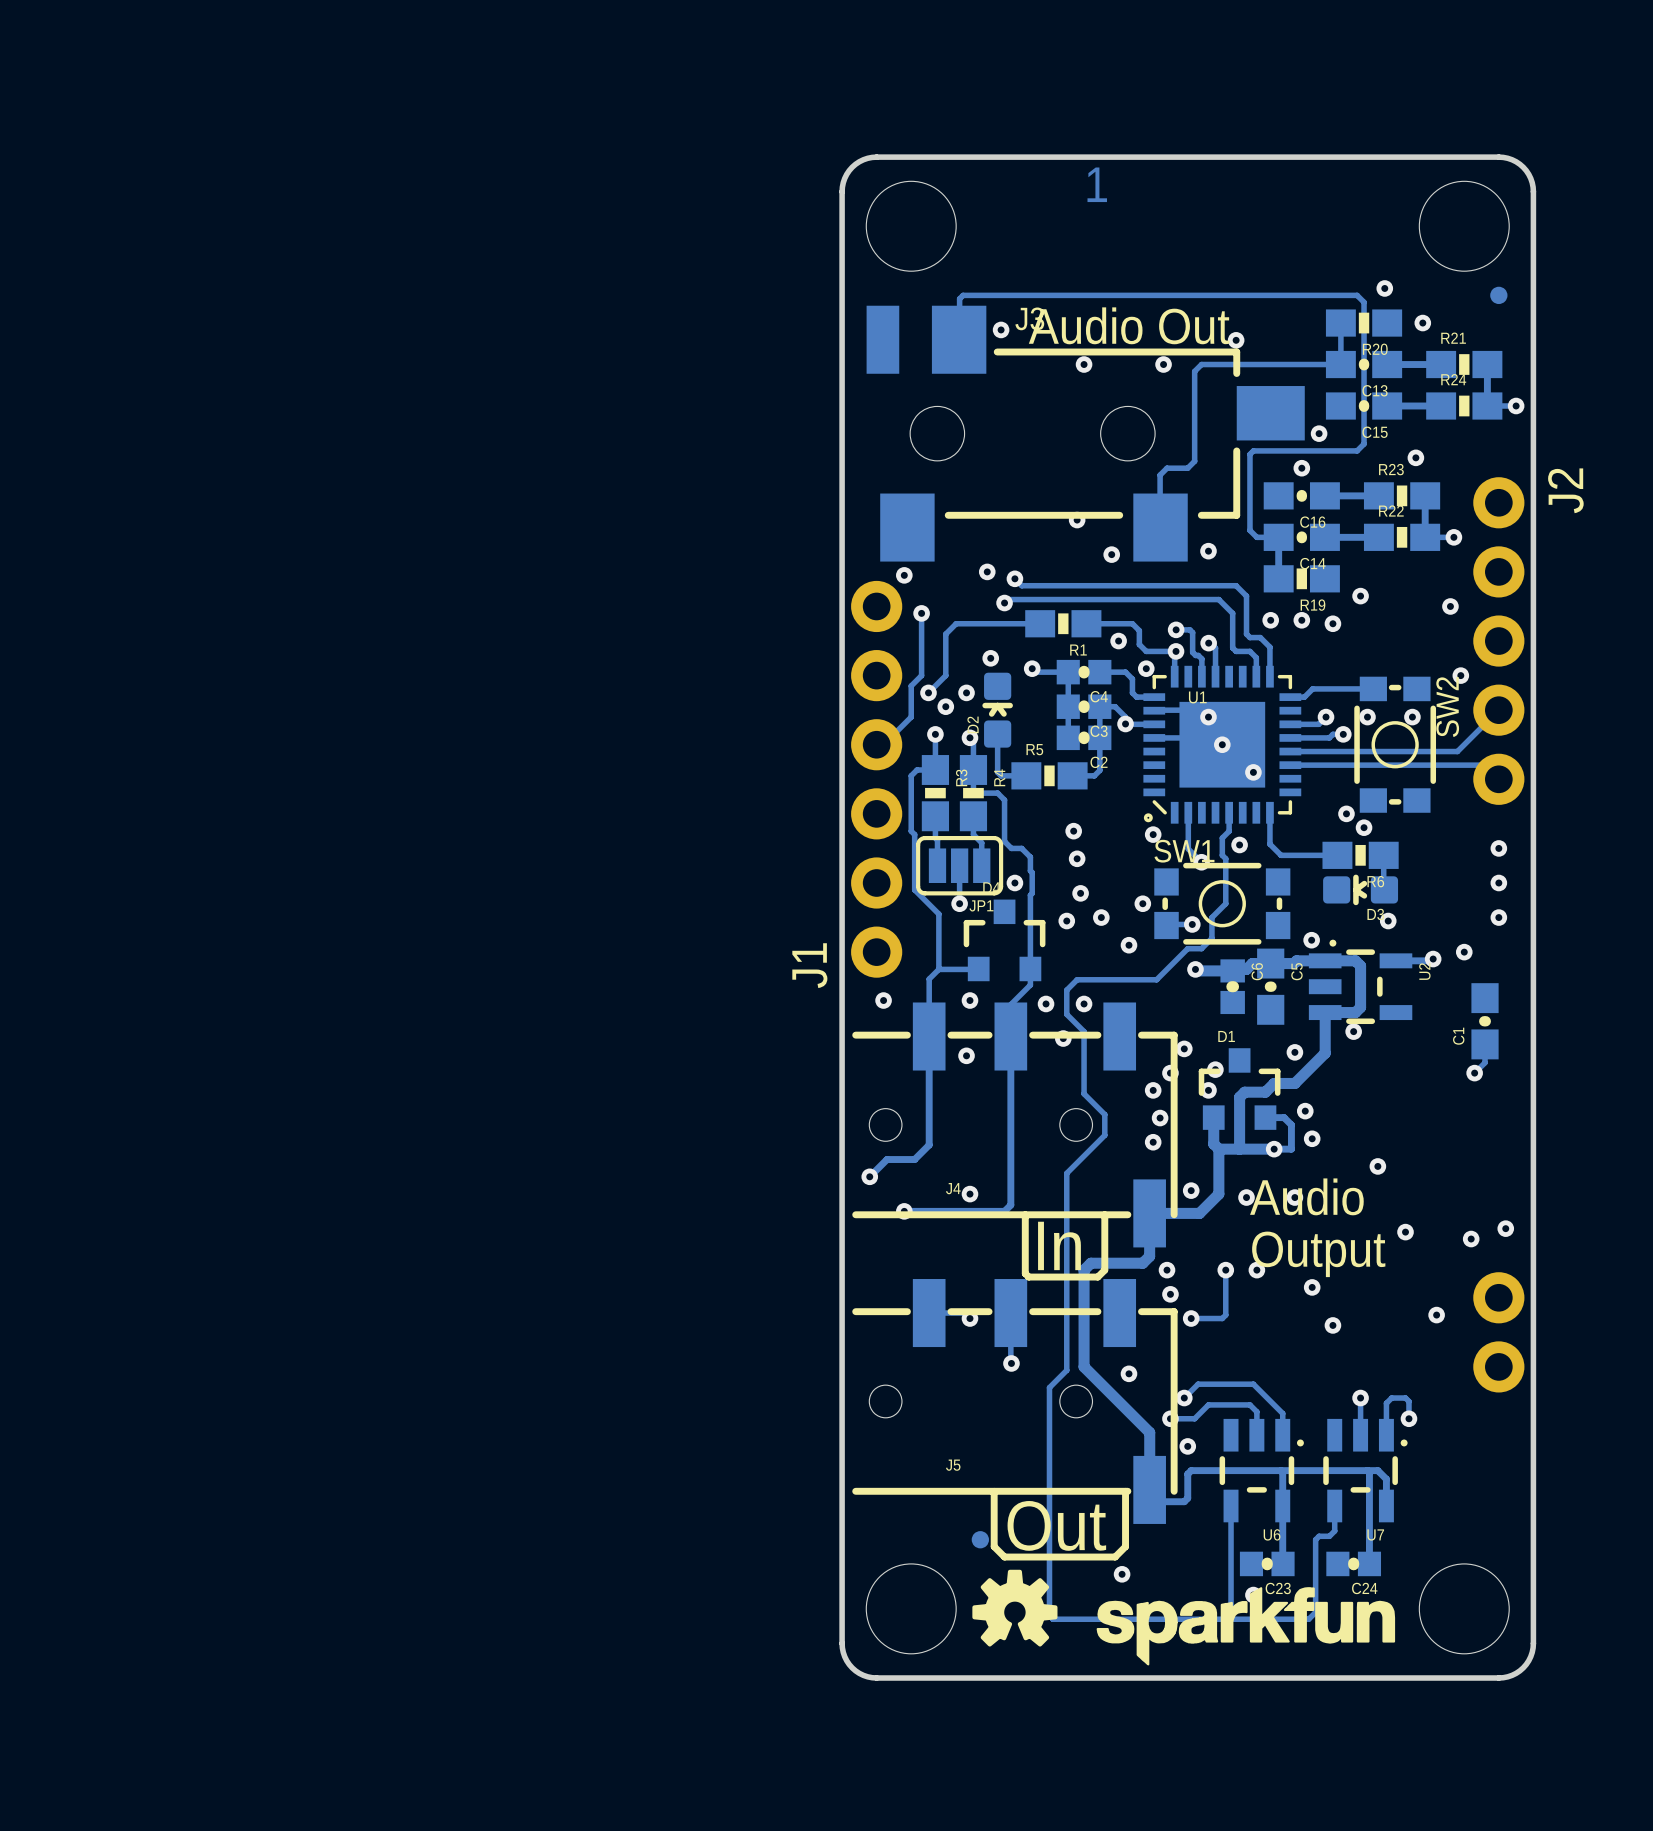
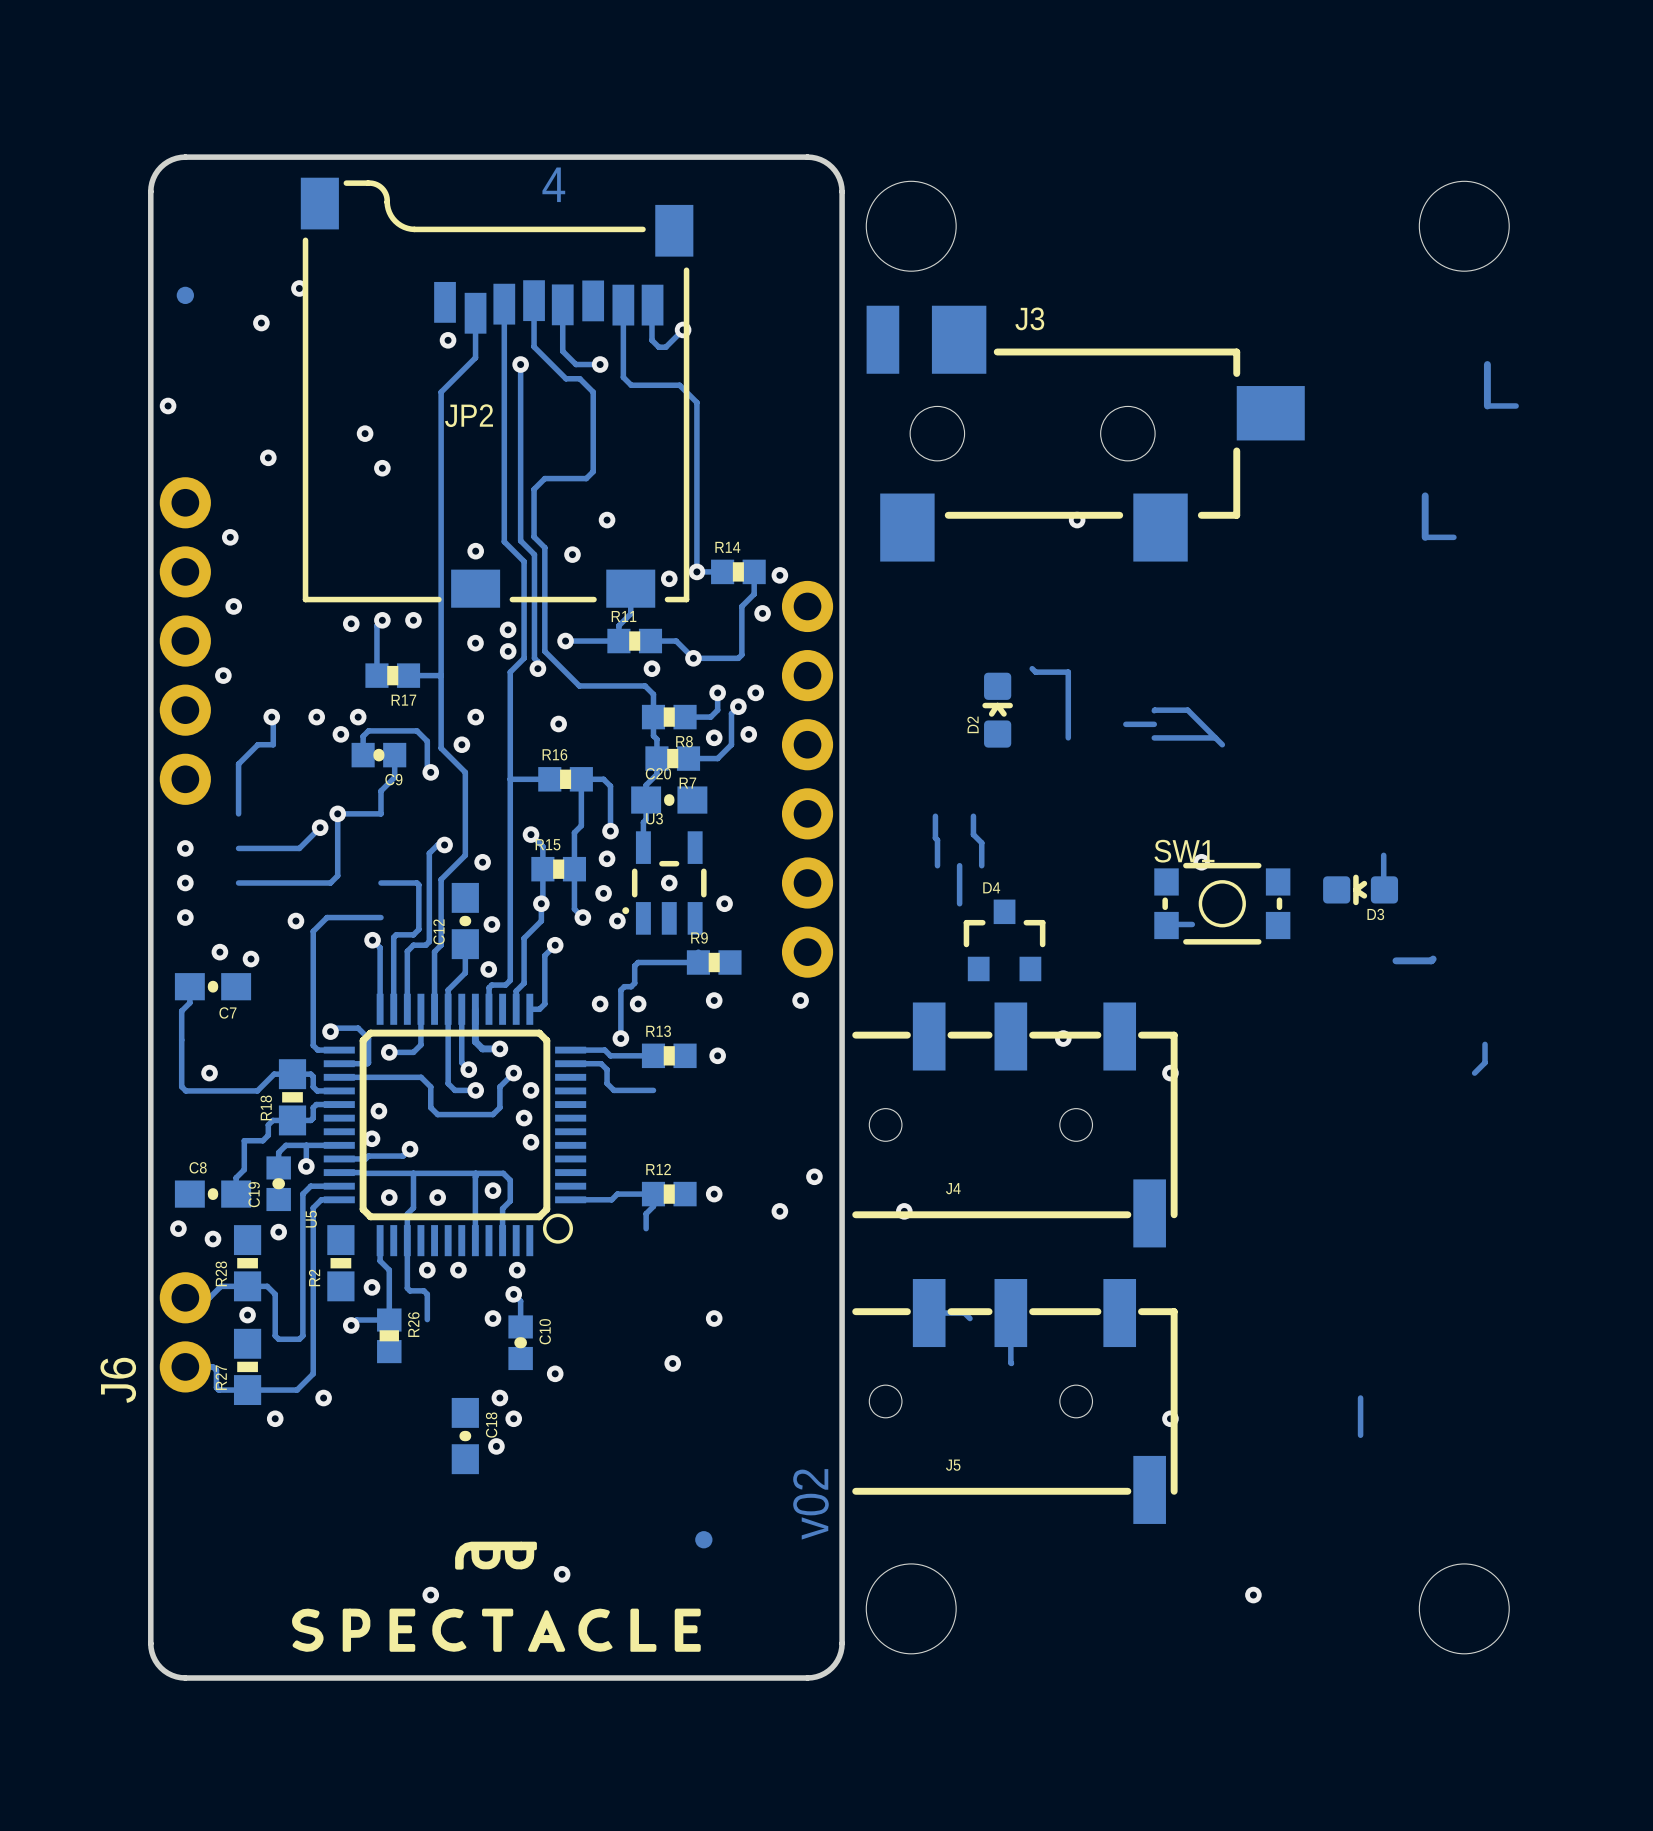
text: none -> 4 (553, 184)
text: 1 (1097, 184) -> none
board edge: (842, 191) (844, 178) (852, 167) (863, 159) (876, 157) (1498, 157) (1512, 159) (1523, 167) (1530, 178) (1533, 191) (1533, 1643) (1530, 1656) (1526, 1664) (1516, 1673) (1498, 1678) (876, 1678) (863, 1675) (852, 1667) (844, 1656) (842, 1643) -> (842, 191) (839, 178) (831, 167) (820, 159) (807, 157) (185, 157) (172, 159) (160, 167) (153, 178) (150, 191) (150, 1643) (153, 1656) (157, 1664) (168, 1673) (185, 1678) (807, 1678) (820, 1675) (831, 1667) (839, 1656) (842, 1643)
via: none -> (299, 288)
via: (1384, 288) -> none
part: none -> (185, 295)
part: (1498, 295) -> none
track: none -> (534, 300) (534, 346) (565, 378) (579, 378) (593, 392) (593, 471) (586, 478) (544, 478) (534, 489) (534, 536) (544, 547) (544, 651) (579, 685) (645, 685) (653, 694) (653, 735) (656, 739) (656, 774) (646, 785) (646, 819) (643, 822) (643, 847)
track: none -> (504, 304) (504, 541) (524, 561) (524, 658) (510, 672) (510, 980) (505, 985) (491, 985) (489, 987) (489, 1009)
track: none -> (562, 304) (562, 351) (575, 364) (600, 364)
track: none -> (623, 305) (623, 377) (631, 385) (679, 385) (696, 402) (696, 571) (722, 571)
track: none -> (652, 305) (651, 340) (658, 347) (665, 347) (683, 329)
track: none -> (475, 313) (475, 357) (441, 392) (441, 748) (465, 772) (465, 855) (441, 879) (441, 945) (434, 951) (434, 1009)
via: none -> (261, 323)
track: (1340, 323) (1340, 364) (1201, 364) (1194, 371) (1194, 461) (1187, 468) (1167, 468) (1160, 475) (1160, 527) -> none
R20: (1364, 323) -> none
via: (1422, 323) -> none
text: Audio Out (1129, 325) -> none
via: none -> (683, 329)
via: (1001, 329) -> none
track: (959, 339) (959, 298) (963, 295) (1357, 295) (1364, 302) (1364, 444) (1357, 450) (1253, 450) (1249, 454) (1249, 530) (1256, 537) (1278, 537) (1278, 578) -> none
via: none -> (448, 340)
via: (1236, 340) -> none
track: none -> (520, 364) (520, 540) (534, 554) (534, 658) (537, 661) (537, 668)
via: none -> (520, 364)
via: none -> (600, 364)
via: (1084, 364) -> none
via: (1163, 364) -> none
C13: (1364, 364) -> none
track: (1441, 364) (1387, 364) -> none
R21: (1464, 364) -> none
JP2: none -> (497, 392)
via: none -> (168, 405)
C15: (1364, 405) -> none
track: (1441, 405) (1387, 405) -> none
R24: (1464, 405) -> none
via: (1516, 405) -> none
via: none -> (365, 433)
via: (1319, 433) -> none
via: none -> (268, 457)
via: (1415, 457) -> none
via: none -> (382, 468)
via: (1301, 468) -> none
C16: (1301, 495) -> none
track: (1378, 495) (1324, 495) -> none
R23: (1402, 495) -> none
via: none -> (607, 520)
via: none -> (230, 537)
C14: (1301, 537) -> none
track: (1378, 537) (1324, 537) -> none
R22: (1402, 537) -> none
via: (1453, 537) -> none
via: none -> (475, 551)
via: (1208, 551) -> none
via: none -> (572, 554)
via: (1111, 554) -> none
via: none -> (696, 571)
R14: none -> (738, 571)
track: none -> (754, 571) (754, 594) (741, 606) (741, 654) (738, 658) (693, 658) (676, 641) (650, 641)
via: (987, 571) -> none
via: none -> (779, 575)
via: (904, 575) -> none
via: none -> (669, 578)
track: (1014, 578) (1021, 585) (1236, 585) (1246, 596) (1246, 634) (1249, 637) (1260, 637) (1269, 647) (1269, 676) -> none
via: (1014, 578) -> none
R19: (1301, 578) -> none
track: none -> (630, 588) (630, 613) (618, 625) (618, 641) (565, 641)
via: (1360, 596) -> none
track: (1004, 603) (1004, 599) (1218, 599) (1232, 613) (1232, 647) (1236, 651) (1249, 651) (1256, 657) (1256, 676) -> none
via: (1004, 603) -> none
via: none -> (233, 606)
via: (1450, 606) -> none
via: none -> (762, 613)
track: (921, 613) (921, 675) (911, 685) (911, 717) (883, 744) (876, 744) -> none
via: (921, 613) -> none
track: none -> (382, 620) (376, 625) (376, 675)
via: none -> (382, 620)
via: none -> (413, 620)
via: (1270, 620) -> none
via: (1301, 620) -> none
via: none -> (351, 623)
track: (1040, 623) (956, 623) (945, 634) (945, 675) (928, 692) -> none
R1: (1063, 623) -> none
track: (1086, 623) (1132, 623) (1139, 630) (1139, 644) (1146, 651) (1176, 651) (1174, 676) -> none
via: (1332, 623) -> none
via: none -> (508, 629)
track: (1176, 629) (1189, 629) (1192, 632) (1192, 652) (1201, 659) (1201, 676) -> none
via: (1176, 629) -> none
part: none -> (185, 641)
via: none -> (565, 641)
R11: none -> (634, 641)
via: (1118, 641) -> none
J2: (1498, 641) -> none
via: none -> (475, 643)
track: (1208, 643) (1215, 648) (1215, 676) -> none
via: (1208, 643) -> none
via: none -> (508, 651)
via: (1176, 651) -> none
via: none -> (693, 658)
via: (990, 658) -> none
via: none -> (537, 668)
via: none -> (651, 668)
via: (1032, 668) -> none
via: (1146, 668) -> none
C4: (1084, 672) -> none
track: (1099, 672) (1125, 672) (1132, 679) (1132, 692) (1136, 697) (1154, 697) -> none
via: none -> (223, 675)
R17: none -> (392, 675)
track: none -> (441, 675) (408, 675)
via: (1460, 675) -> none
track: (1373, 688) (1312, 688) (1304, 697) (1290, 697) -> none
track: none -> (717, 692) (717, 710) (710, 717) (685, 717)
via: none -> (717, 692)
via: none -> (755, 692)
via: (928, 692) -> none
via: (966, 692) -> none
track: none -> (738, 706) (731, 713) (731, 744) (717, 758) (688, 758)
via: none -> (738, 706)
via: (945, 706) -> none
C3: (1084, 706) -> none
track: (1498, 710) (1457, 751) (1290, 751) -> none
track: none -> (271, 717) (273, 744) (257, 744) (238, 764) (238, 813)
via: none -> (271, 717)
via: none -> (316, 717)
via: none -> (358, 717)
via: none -> (475, 717)
R8: none -> (669, 717)
via: (1208, 717) -> none
track: (1326, 717) (1318, 724) (1290, 724) -> none
via: (1326, 717) -> none
via: (1367, 717) -> none
via: (1412, 717) -> none
via: none -> (558, 724)
track: (1125, 724) (1125, 717) (1115, 706) (1099, 706) (1099, 770) (1094, 775) (1072, 775) -> none
via: (1125, 724) -> none
via: none -> (340, 734)
via: none -> (748, 734)
track: (935, 734) (935, 769) (917, 769) (911, 775) (911, 831) (914, 834) (914, 889) (938, 914) (938, 969) -> none
via: (935, 734) -> none
track: (997, 734) (997, 772) (1001, 775) (1026, 775) -> none
track: (1343, 734) (1332, 734) (1329, 737) (1290, 737) -> none
via: (1343, 734) -> none
via: none -> (714, 737)
track: (969, 737) (973, 741) (973, 789) (976, 793) (997, 793) (1004, 800) (1004, 841) (1011, 848) (1021, 848) (1030, 857) (1030, 870) (1032, 872) (1030, 985) (1010, 1004) (1010, 1205) (1004, 1211) (904, 1211) -> none
via: (969, 737) -> none
C2: (1084, 737) -> none
via: none -> (461, 744)
U1: (1222, 744) -> none
via: (1222, 744) -> none
SW2: (1395, 744) -> none
track: none -> (363, 755) (363, 736) (368, 730) (416, 730) (427, 741) (427, 768) (430, 772)
C9: none -> (378, 755)
track: none -> (394, 755) (394, 777) (380, 791) (380, 813) (337, 813) (337, 875) (330, 883) (238, 883)
R7: none -> (672, 758)
track: (1290, 765) (1484, 765) (1498, 779) -> none
via: none -> (430, 772)
via: (1253, 772) -> none
R5: (1049, 775) -> none
track: none -> (549, 779) (510, 779)
R16: none -> (565, 779)
J1 position: (876, 779) -> (807, 779)
R3: (935, 793) -> none
R4: (973, 793) -> none
C20: none -> (669, 800)
track: (1188, 812) (1188, 848) (1201, 862) -> none
track: (1229, 812) (1229, 831) (1222, 838) (1222, 855) (1225, 858) (1225, 903) (1211, 917) (1211, 938) (1201, 948) (1187, 948) (1156, 979) (1077, 979) (1066, 990) (1066, 1014) (1084, 1031) (1084, 1093) (1104, 1114) (1104, 1135) (1066, 1173) (1066, 1370) (1049, 1387) (1049, 1615) (1052, 1619) (1308, 1619) (1315, 1612) (1315, 1539) (1319, 1536) (1329, 1536) (1334, 1531) (1334, 1506) -> none
track: (1269, 812) (1269, 844) (1281, 855) (1337, 855) -> none
via: none -> (337, 813)
via: (1346, 813) -> none
track: none -> (320, 827) (299, 848) (238, 848)
via: none -> (320, 827)
via: (1364, 827) -> none
track: none -> (610, 831) (610, 786) (603, 779) (581, 779) (581, 825) (574, 832) (574, 909) (582, 917)
via: none -> (610, 831)
via: (1073, 831) -> none
track: none -> (531, 834) (542, 846) (541, 921) (524, 938) (524, 983) (516, 991) (516, 1009)
via: none -> (531, 834)
via: (1153, 834) -> none
track: none -> (444, 844) (437, 844) (429, 853) (429, 941) (425, 945) (413, 945) (407, 951) (407, 1009)
via: none -> (444, 844)
via: (1239, 844) -> none
via: none -> (185, 848)
via: (1498, 848) -> none
R6: (1360, 855) -> none
via: none -> (607, 858)
via: (1077, 858) -> none
via: none -> (482, 862)
JP1: (959, 865) -> none
R15: none -> (558, 869)
via: none -> (185, 883)
track: none -> (380, 883) (416, 883) (418, 884) (418, 929) (413, 934) (396, 934) (393, 937) (393, 1009)
U3: none -> (664, 883)
via: none -> (669, 883)
via: (1014, 883) -> none
via: (1498, 883) -> none
via: none -> (603, 893)
via: (1080, 893) -> none
via: none -> (541, 903)
via: none -> (724, 903)
via: (959, 903) -> none
via: (1142, 903) -> none
via: none -> (185, 917)
track: none -> (380, 917) (327, 917) (313, 931) (313, 1045) (317, 1050) (339, 1050)
via: none -> (582, 917)
via: (1101, 917) -> none
via: (1498, 917) -> none
via: none -> (295, 921)
C12: none -> (465, 921)
via: none -> (617, 921)
via: (1066, 921) -> none
via: (1388, 921) -> none
via: none -> (491, 924)
via: (1192, 924) -> none
track: none -> (372, 940) (380, 947) (380, 1009)
via: none -> (372, 940)
via: (1311, 940) -> none
track: none -> (465, 944) (465, 972) (448, 990) (448, 1083) (454, 1090) (475, 1090)
track: none -> (555, 945) (544, 955) (544, 1003) (539, 1009) (529, 1009)
via: none -> (555, 945)
via: (1128, 945) -> none
via: none -> (219, 952)
track: none -> (698, 952) (693, 957) (693, 962) (638, 962) (634, 965) (634, 983) (631, 986) (624, 986) (620, 990) (620, 1038)
via: (1464, 952) -> none
via: none -> (251, 959)
via: (1433, 959) -> none
R9: none -> (714, 962)
track: (978, 968) (938, 969) -> none
via: none -> (488, 969)
track: (938, 969) (929, 979) (929, 1145) (914, 1159) (887, 1159) (869, 1176) -> none
track: (1195, 969) (1232, 970) (1246, 969) (1252, 963) (1293, 963) (1296, 960) (1355, 960) (1360, 965) (1360, 1007) (1355, 1012) (1325, 1012) (1325, 1053) (1294, 1083) (1274, 1083) (1265, 1092) (1244, 1092) (1239, 1097) (1239, 1149) -> none
via: (1195, 969) -> none
U2: (1360, 981) -> none
track: none -> (189, 986) (189, 1002) (181, 1011) (181, 1086) (185, 1090) (257, 1090) (274, 1074) (310, 1074) (313, 1076) (313, 1086) (317, 1090) (339, 1090)
C7: none -> (213, 986)
C6: (1232, 986) -> none
C5: (1270, 986) -> none
via: none -> (714, 1000)
via position: (883, 1000) -> (800, 1000)
via: (969, 1000) -> none
via: none -> (600, 1003)
via: none -> (638, 1003)
via: (1046, 1003) -> none
via: (1084, 1003) -> none
track: none -> (420, 1009) (420, 1044) (413, 1052) (389, 1052)
track: none -> (461, 1009) (461, 1062) (468, 1069)
track: none -> (475, 1009) (475, 1041) (482, 1048) (499, 1048)
C1: (1485, 1021) -> none
track: none -> (330, 1031) (333, 1028) (358, 1028) (368, 1038) (367, 1063) (339, 1063)
via: none -> (330, 1031)
via: (1353, 1031) -> none
via: none -> (620, 1038)
via: none -> (499, 1048)
via: (1184, 1048) -> none
track: none -> (570, 1050) (604, 1050) (610, 1055) (653, 1055)
via: none -> (389, 1052)
via: (1294, 1052) -> none
R13: none -> (669, 1055)
via: none -> (717, 1055)
via: (966, 1055) -> none
track: none -> (570, 1063) (601, 1063) (607, 1069) (607, 1083) (613, 1090) (653, 1090)
via: none -> (468, 1069)
via: (1215, 1069) -> none
via: none -> (209, 1073)
track: none -> (513, 1073) (499, 1086) (499, 1107) (492, 1114) (437, 1114) (430, 1107) (430, 1086) (421, 1077) (339, 1077)
via: none -> (513, 1073)
via: (1474, 1073) -> none
D1: (1239, 1089) -> none
via: none -> (475, 1090)
via: none -> (531, 1090)
via: (1153, 1090) -> none
via: (1208, 1090) -> none
R18: none -> (292, 1097)
track: none -> (339, 1104) (316, 1104) (313, 1107) (313, 1118) (310, 1120) (272, 1120) (268, 1124) (268, 1135) (262, 1140) (244, 1140) (244, 1169) (236, 1177) (236, 1194)
via: none -> (378, 1111)
via: (1305, 1111) -> none
track: (1213, 1117) (1213, 1144) (1218, 1149) -> none
track: (1265, 1117) (1284, 1117) (1291, 1124) (1291, 1149) (1218, 1149) -> none
via: none -> (524, 1118)
via: (1160, 1118) -> none
U5: none -> (454, 1124)
via: none -> (372, 1138)
via: (1312, 1138) -> none
via: none -> (531, 1142)
via: (1153, 1142) -> none
track: none -> (306, 1145) (306, 1166)
track: none -> (339, 1145) (285, 1145) (278, 1152) (278, 1167)
track: none -> (410, 1149) (403, 1156) (368, 1156) (365, 1158) (339, 1158)
via: none -> (410, 1149)
track: (1218, 1149) (1218, 1194) (1199, 1213) (1149, 1213) (1149, 1256) (1142, 1263) (1090, 1263) (1084, 1270) (1084, 1366) (1149, 1432) (1149, 1494) (1156, 1501) -> none
via: (1274, 1149) -> none
via: none -> (306, 1166)
via: (1377, 1166) -> none
track: none -> (339, 1172) (503, 1173) (510, 1180) (510, 1201) (502, 1208) (502, 1240)
track: none -> (413, 1173) (413, 1207) (407, 1214) (407, 1288) (410, 1290) (423, 1290) (427, 1294) (427, 1319)
via: none -> (814, 1176)
via: (869, 1176) -> none
track: none -> (475, 1177) (475, 1240)
C19: none -> (278, 1183)
track: none -> (339, 1186) (310, 1186) (302, 1194) (302, 1335) (299, 1339) (278, 1339) (275, 1335) (275, 1294) (267, 1286) (220, 1286) (209, 1297) (185, 1297)
via: none -> (492, 1190)
via: (1191, 1190) -> none
C8: none -> (213, 1194)
R12: none -> (669, 1194)
via: none -> (714, 1194)
via: (969, 1194) -> none
text: Audio (1306, 1196) -> none
via: none -> (389, 1197)
via: none -> (437, 1197)
via: (1246, 1197) -> none
via: (1294, 1197) -> none
track: none -> (339, 1199) (321, 1199) (313, 1207) (313, 1373) (297, 1390) (218, 1390) (216, 1387) (216, 1370) (213, 1366) (185, 1366)
track: none -> (570, 1199) (611, 1199) (617, 1194) (653, 1194) (653, 1206) (646, 1213) (646, 1228)
via: none -> (779, 1211)
line: (1104, 1214) (1104, 1270) (1097, 1277) (1028, 1277) (1025, 1273) (1025, 1214) -> none
via: none -> (178, 1228)
via: (1505, 1228) -> none
via: none -> (278, 1232)
via: (1405, 1232) -> none
via: none -> (213, 1239)
via: (1471, 1239) -> none
track: none -> (380, 1240) (380, 1260) (389, 1270) (389, 1320) (356, 1320) (351, 1325)
text: In (1059, 1245) -> none
text: Output (1318, 1254) -> none
R28: none -> (247, 1263)
R2: none -> (340, 1263)
via: none -> (427, 1270)
via: none -> (458, 1270)
via: none -> (517, 1270)
via: (1167, 1270) -> none
track: (1225, 1270) (1225, 1315) (1222, 1318) (1191, 1318) -> none
via: (1225, 1270) -> none
via: (1256, 1270) -> none
via: none -> (372, 1287)
via: (1312, 1287) -> none
track: none -> (513, 1294) (520, 1301) (520, 1326)
via: none -> (513, 1294)
via: (1170, 1294) -> none
via: none -> (247, 1315)
via: (1436, 1315) -> none
via: none -> (492, 1318)
via: none -> (714, 1318)
via: (969, 1318) -> none
via: (1191, 1318) -> none
via: none -> (351, 1325)
via: (1332, 1325) -> none
J6: none -> (185, 1332)
part: (1498, 1332) -> none
R26: none -> (389, 1335)
C10: none -> (520, 1342)
via: none -> (672, 1363)
via: (1011, 1363) -> none
R27: none -> (247, 1366)
via: none -> (555, 1373)
via: (1128, 1373) -> none
via: none -> (323, 1398)
via: none -> (499, 1398)
track: (1184, 1398) (1198, 1384) (1253, 1384) (1282, 1413) (1282, 1435) -> none
via: (1184, 1398) -> none
via: (1360, 1398) -> none
via: none -> (275, 1418)
via: none -> (513, 1418)
track: (1170, 1418) (1194, 1418) (1208, 1404) (1249, 1404) (1256, 1411) (1256, 1435) -> none
track: (1408, 1418) (1408, 1401) (1405, 1398) (1391, 1398) (1386, 1403) (1386, 1435) -> none
via: (1408, 1418) -> none
C18: none -> (465, 1436)
via: none -> (496, 1446)
via: (1187, 1446) -> none
U6: (1261, 1470) -> none
track: (1281, 1470) (1282, 1472) (1282, 1563) -> none
U7: (1365, 1470) -> none
track: (1367, 1470) (1369, 1472) (1369, 1563) -> none
line: (1125, 1491) (1125, 1546) (1115, 1557) (1004, 1557) (994, 1546) (994, 1491) -> none
track: (1156, 1501) (1184, 1501) (1187, 1498) (1187, 1474) (1191, 1470) (1377, 1470) (1386, 1479) (1386, 1506) -> none
text: none -> v02 (810, 1504)
track: (1231, 1506) (1231, 1617) (1232, 1619) -> none
text: Out (1056, 1525) -> none
part position: (980, 1539) -> (703, 1539)
drawing: none -> [455, 1541, 537, 1570]
C23: (1267, 1563) -> none
C24: (1353, 1563) -> none
drawing: [972, 1569, 1058, 1647] -> none
via: none -> (562, 1574)
via: (1122, 1574) -> none
drawing: [1096, 1587, 1396, 1666] -> none
via: none -> (430, 1595)
drawing: none -> [292, 1608, 701, 1652]

